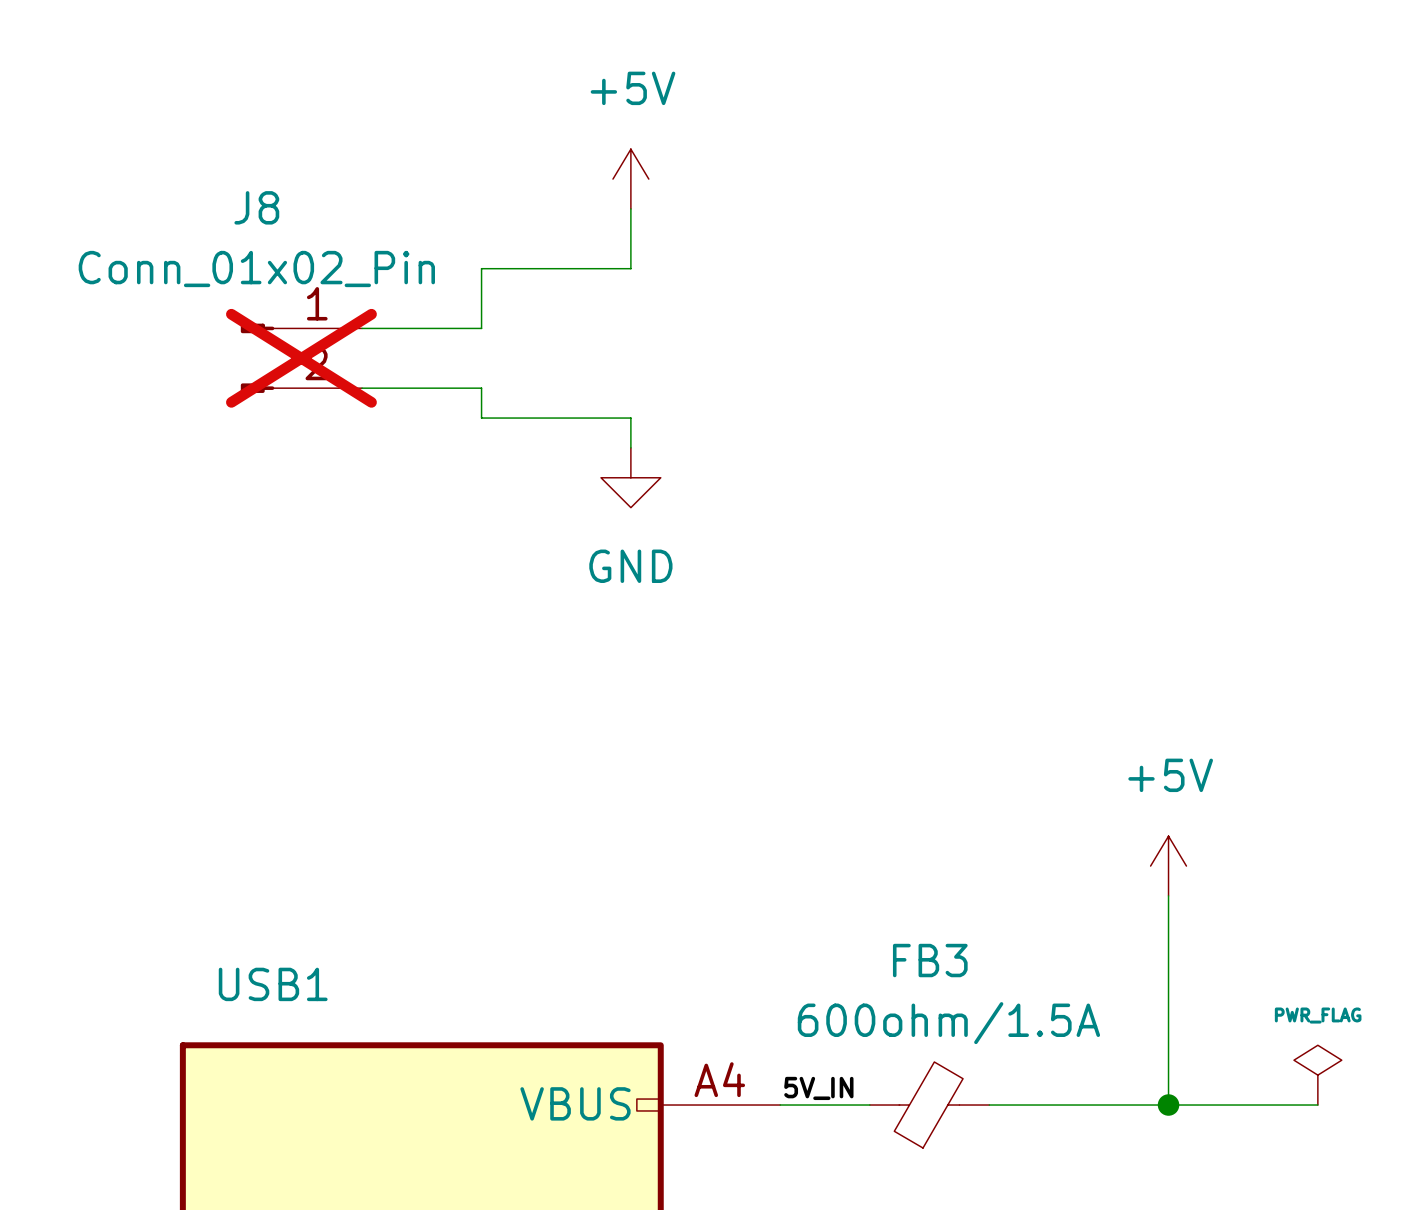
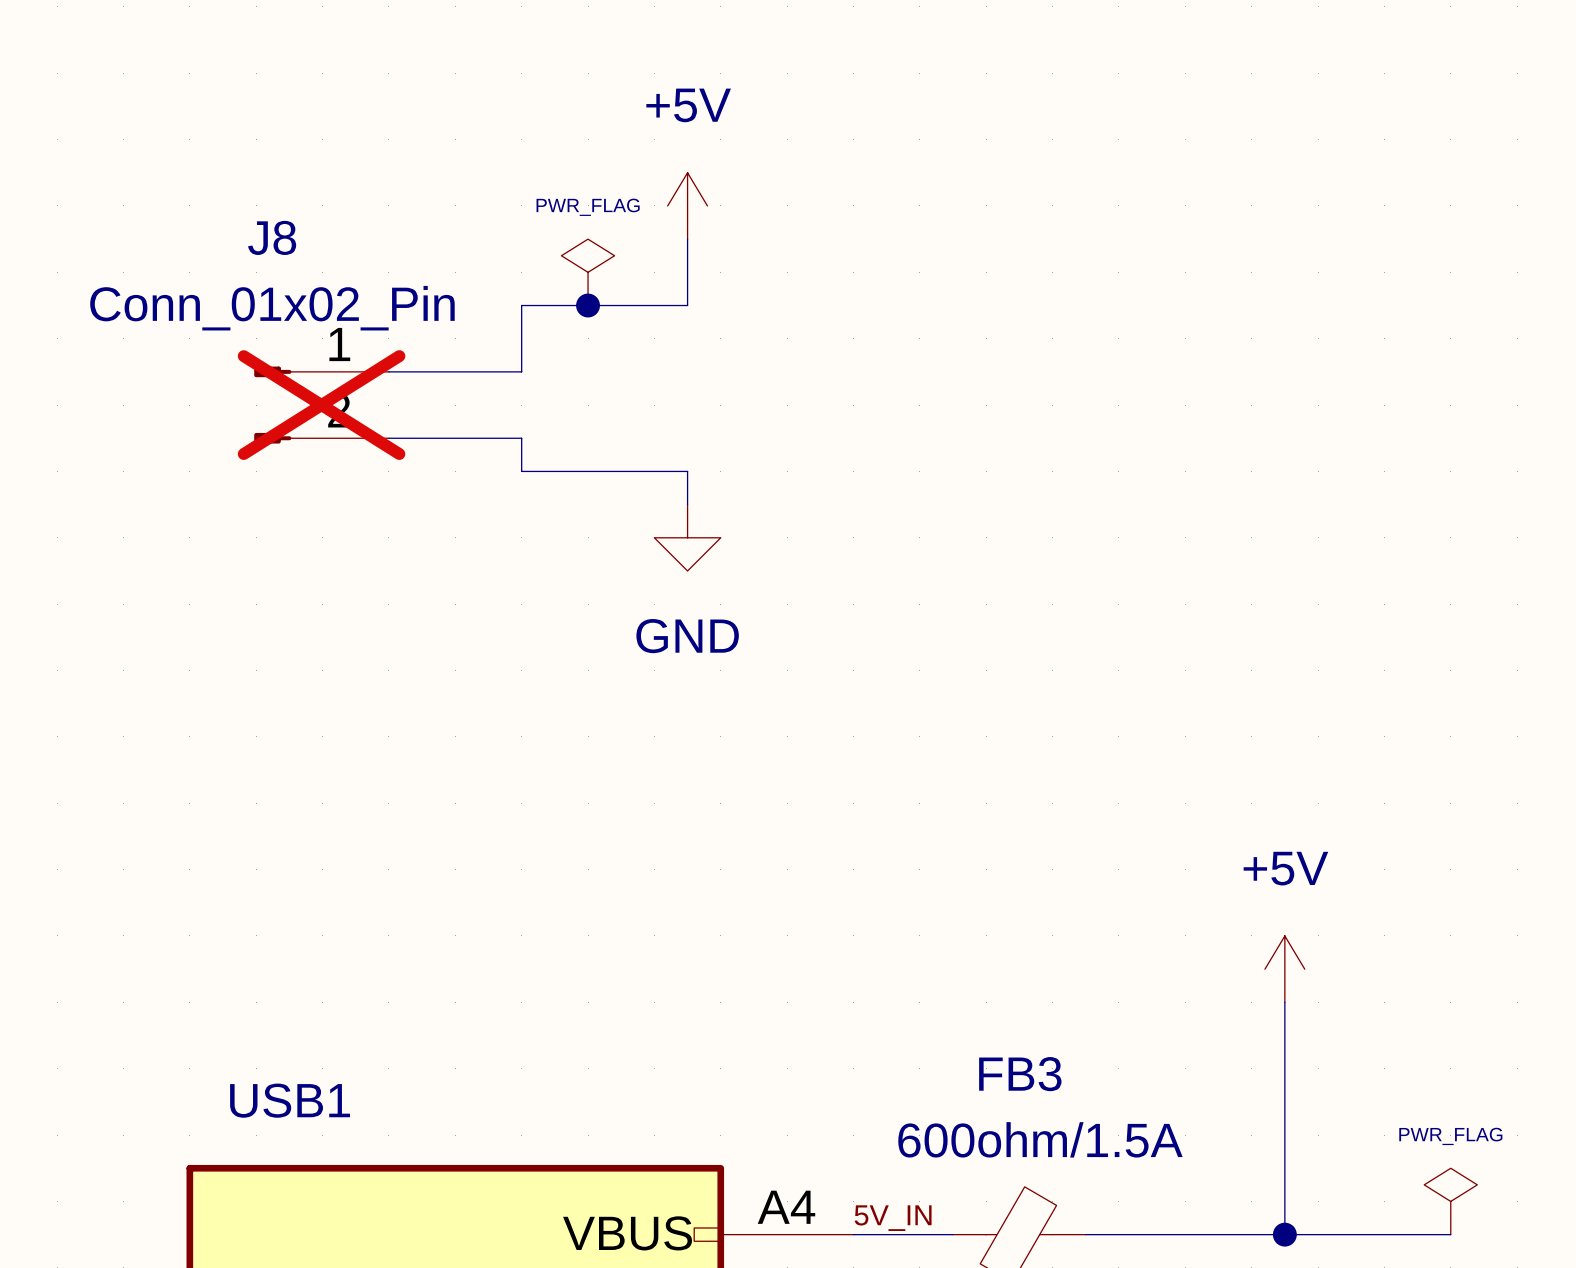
power symbol: none -> PWR_FLAG (588, 272)
junction: none -> (588, 305)

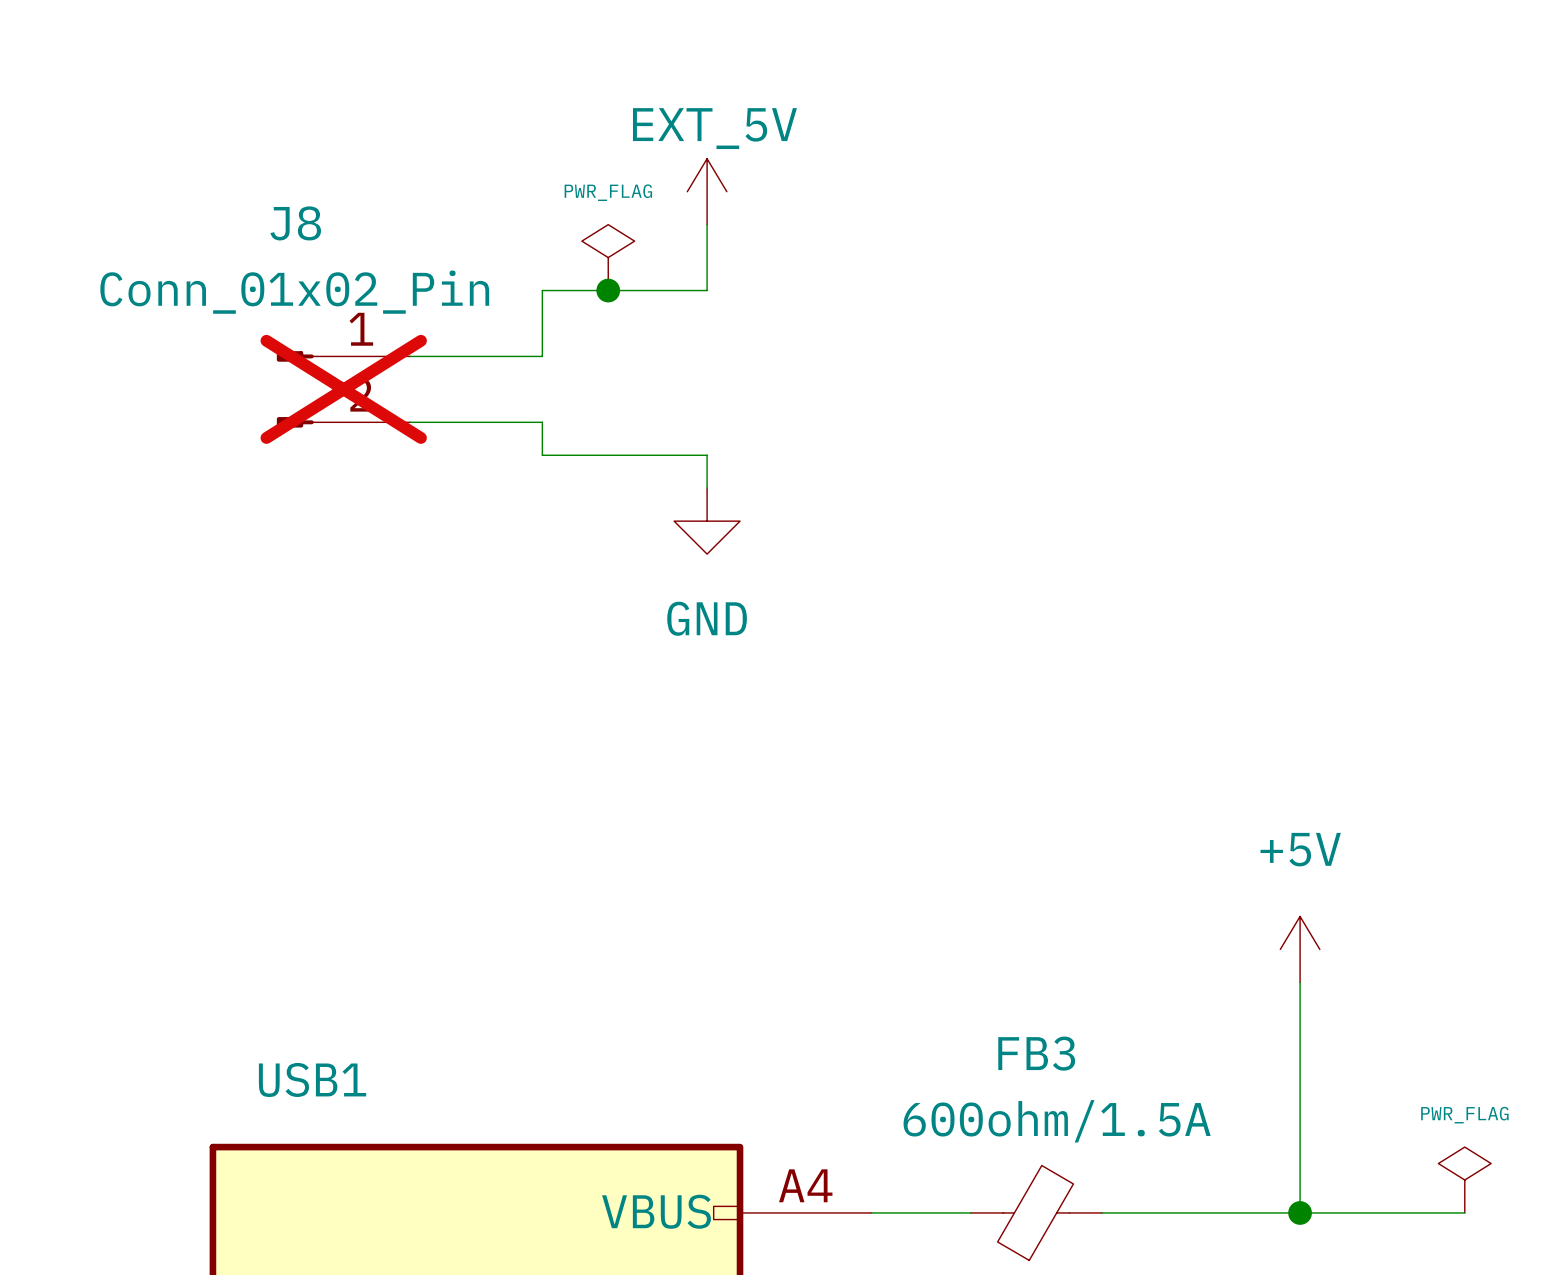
power symbol: +5V (687, 205) -> EXT_5V (707, 191)
label: 5V_IN (893, 1218) -> none

